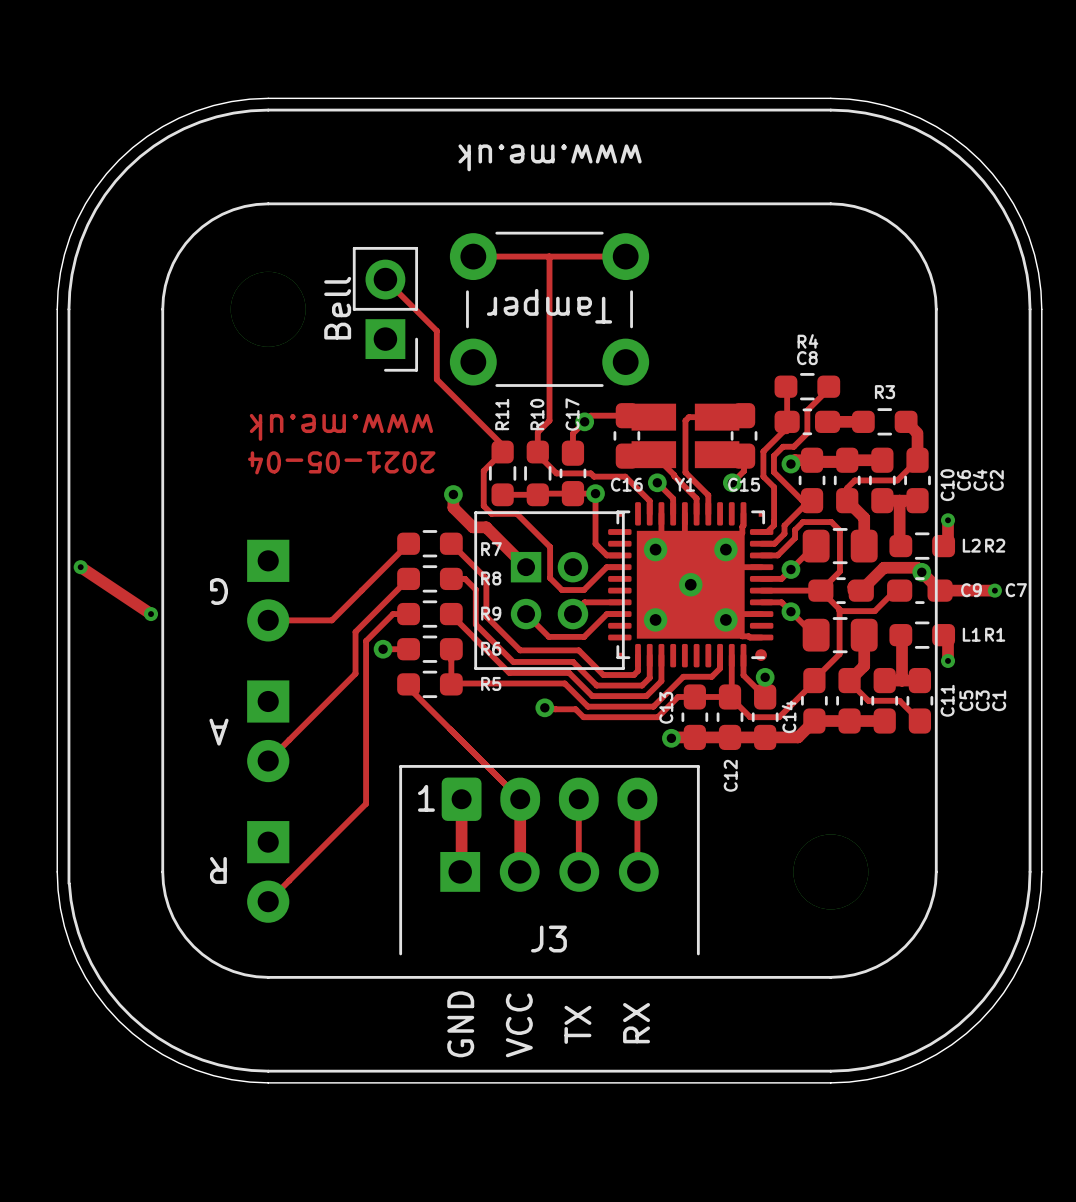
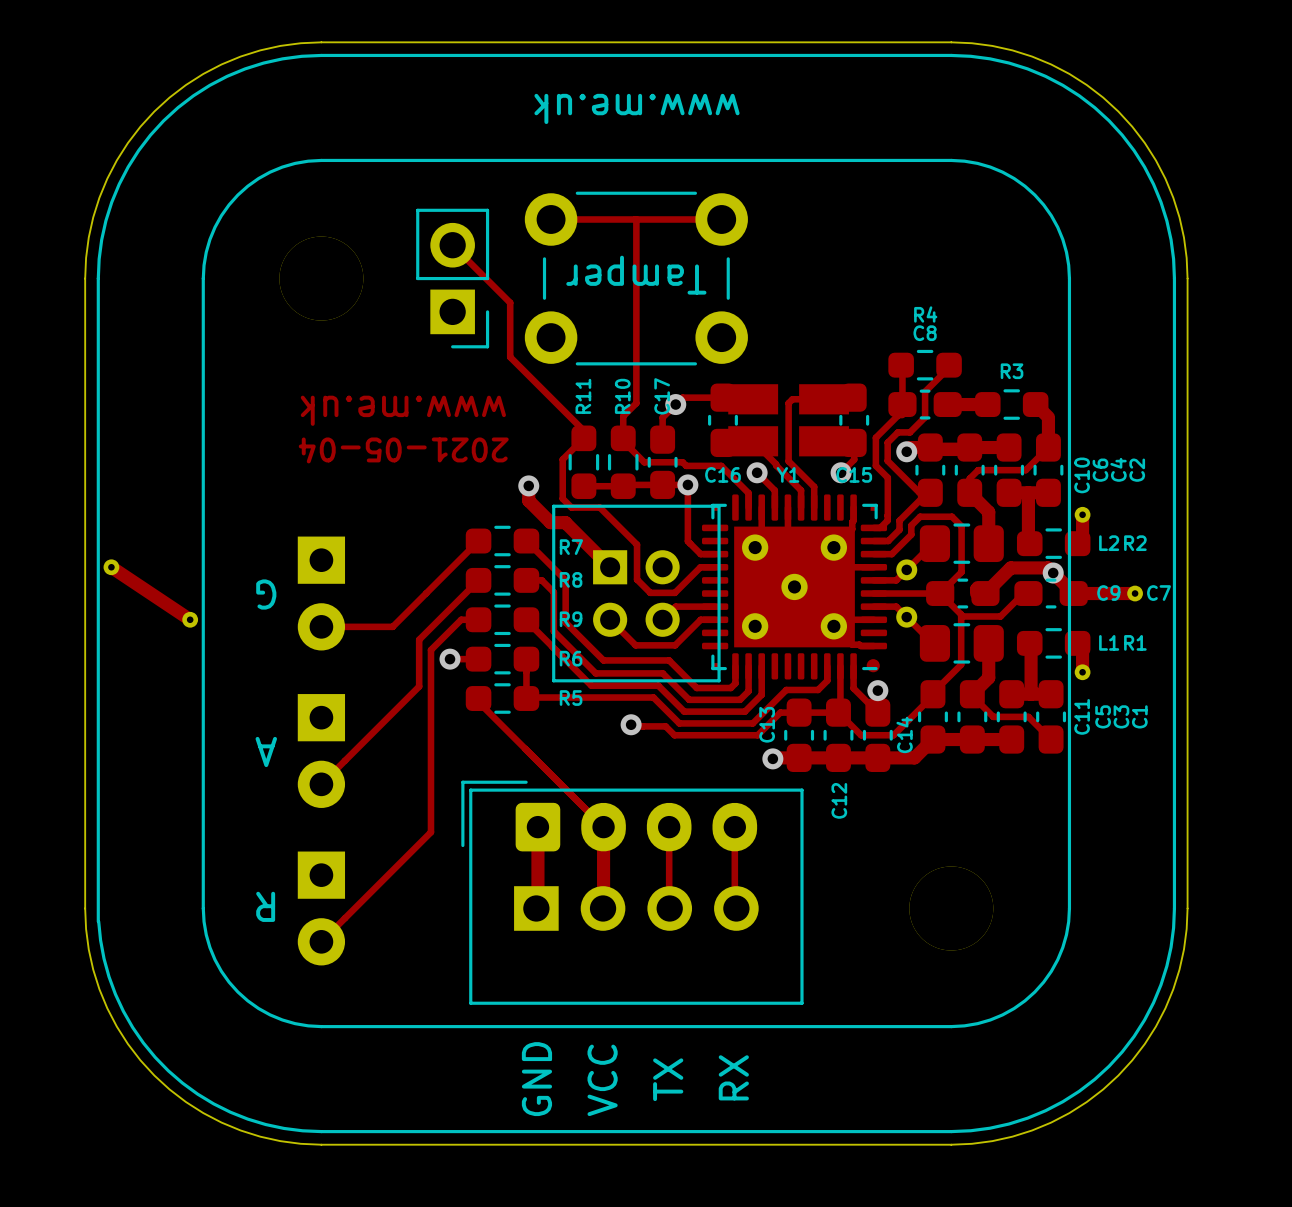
text: Bell (337, 308) -> none
part: none -> (632, 892)
J3: (549, 860) -> none

